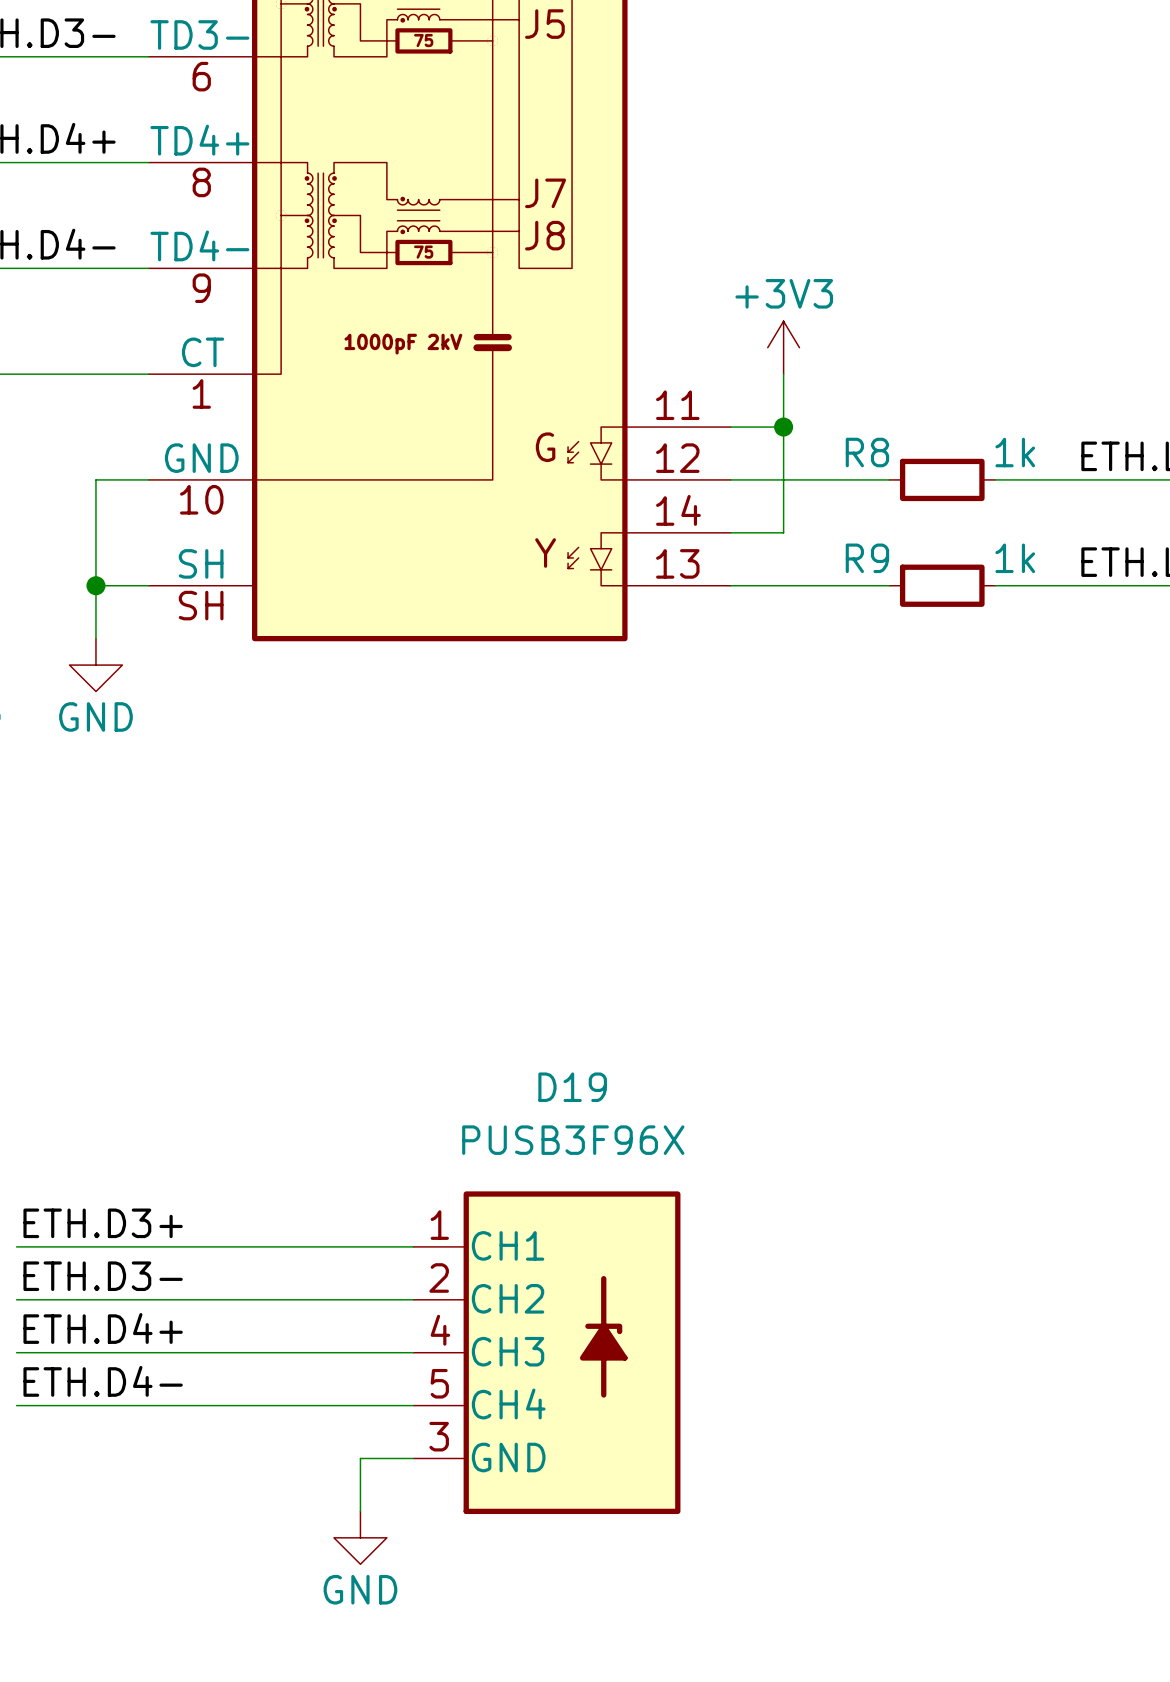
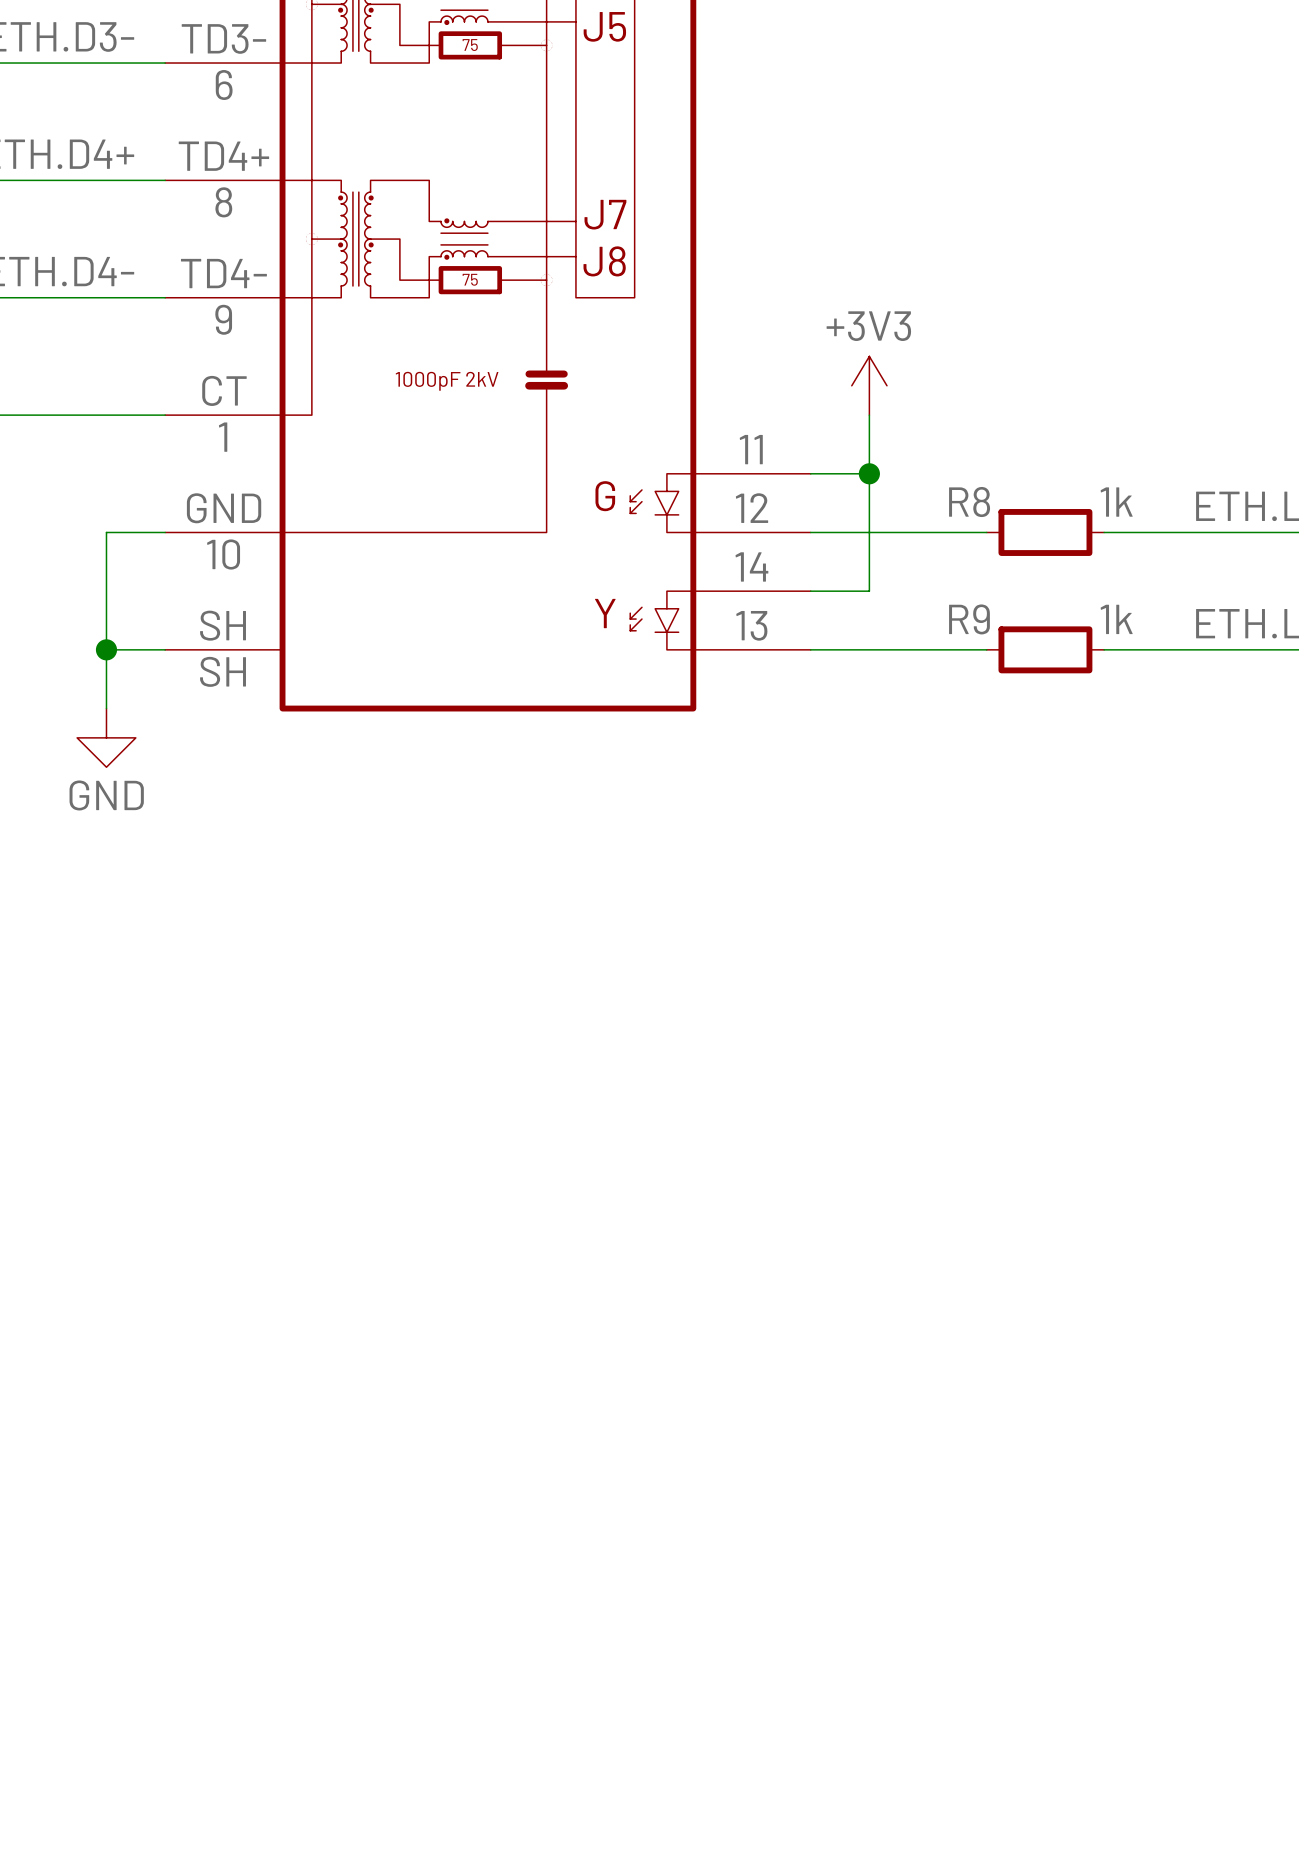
label: ETH.D3+ (103, 1223) -> none
wire: (16, 1246) (413, 1246) -> none
label: ETH.D3- (103, 1276) -> none
wire: (16, 1299) (413, 1299) -> none
label: ETH.D4+ (103, 1328) -> none
wire: (16, 1352) (413, 1352) -> none
D19: (546, 1352) -> none
label: ETH.D4- (103, 1381) -> none
wire: (16, 1405) (413, 1405) -> none
wire: (413, 1458) (360, 1458) (360, 1511) -> none
power symbol: GND (360, 1537) -> none

